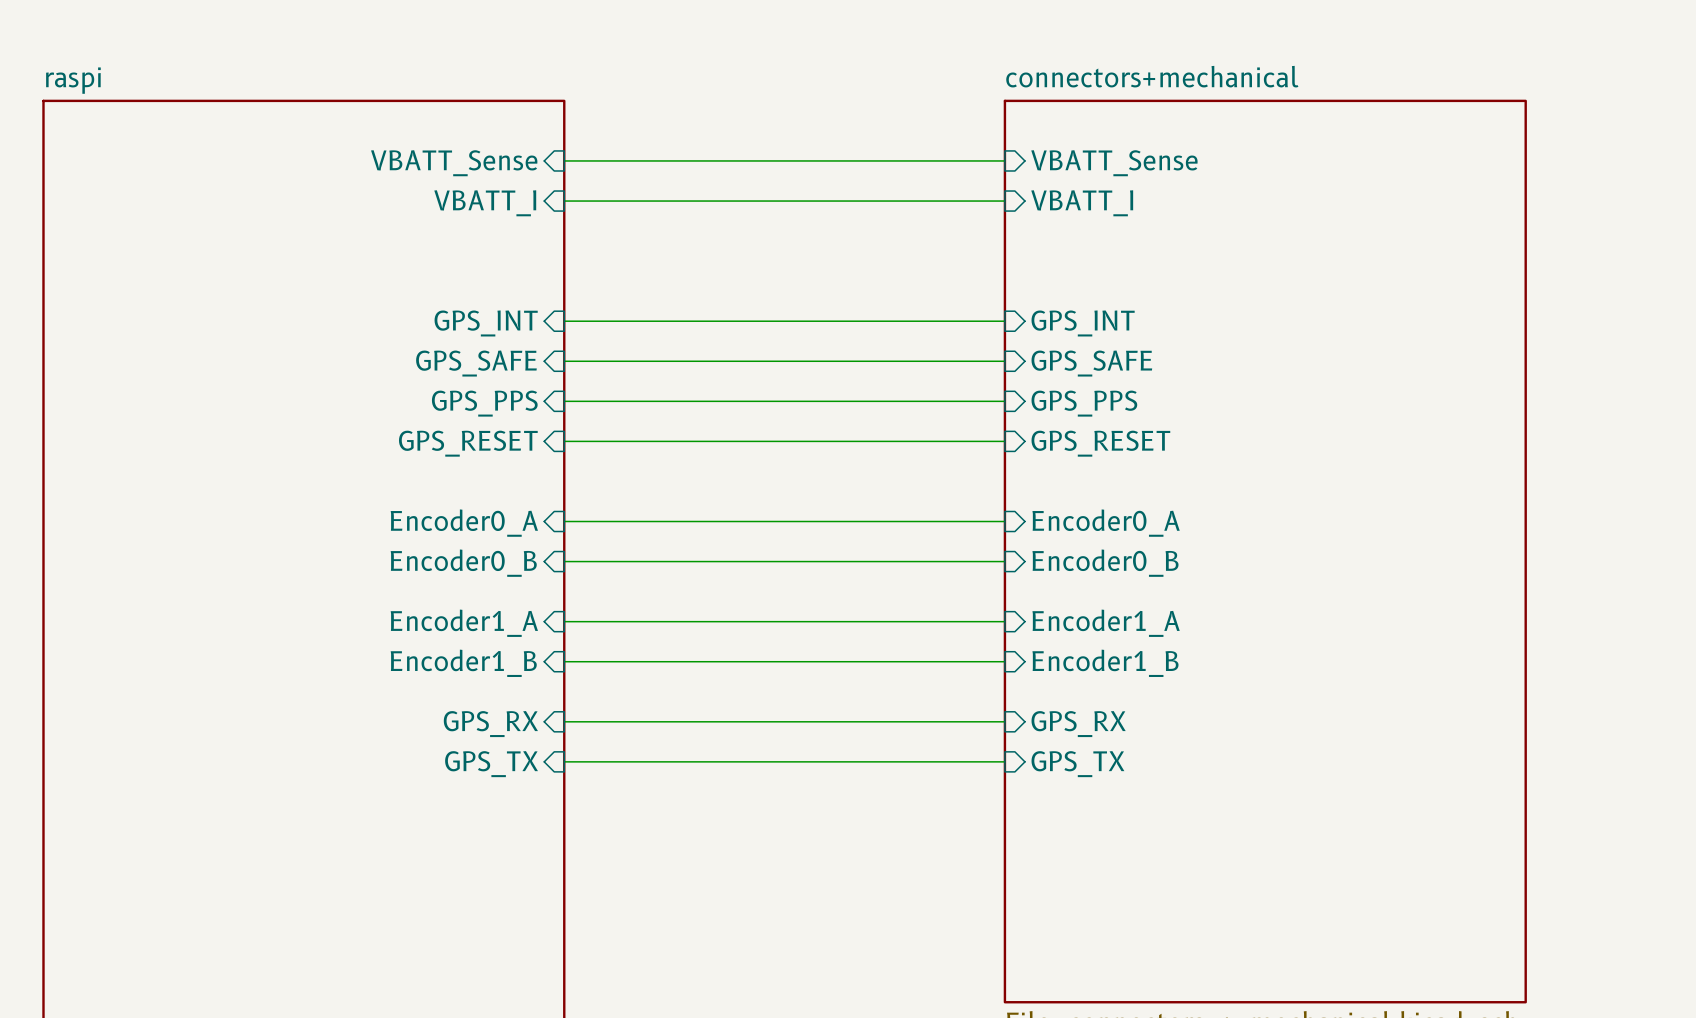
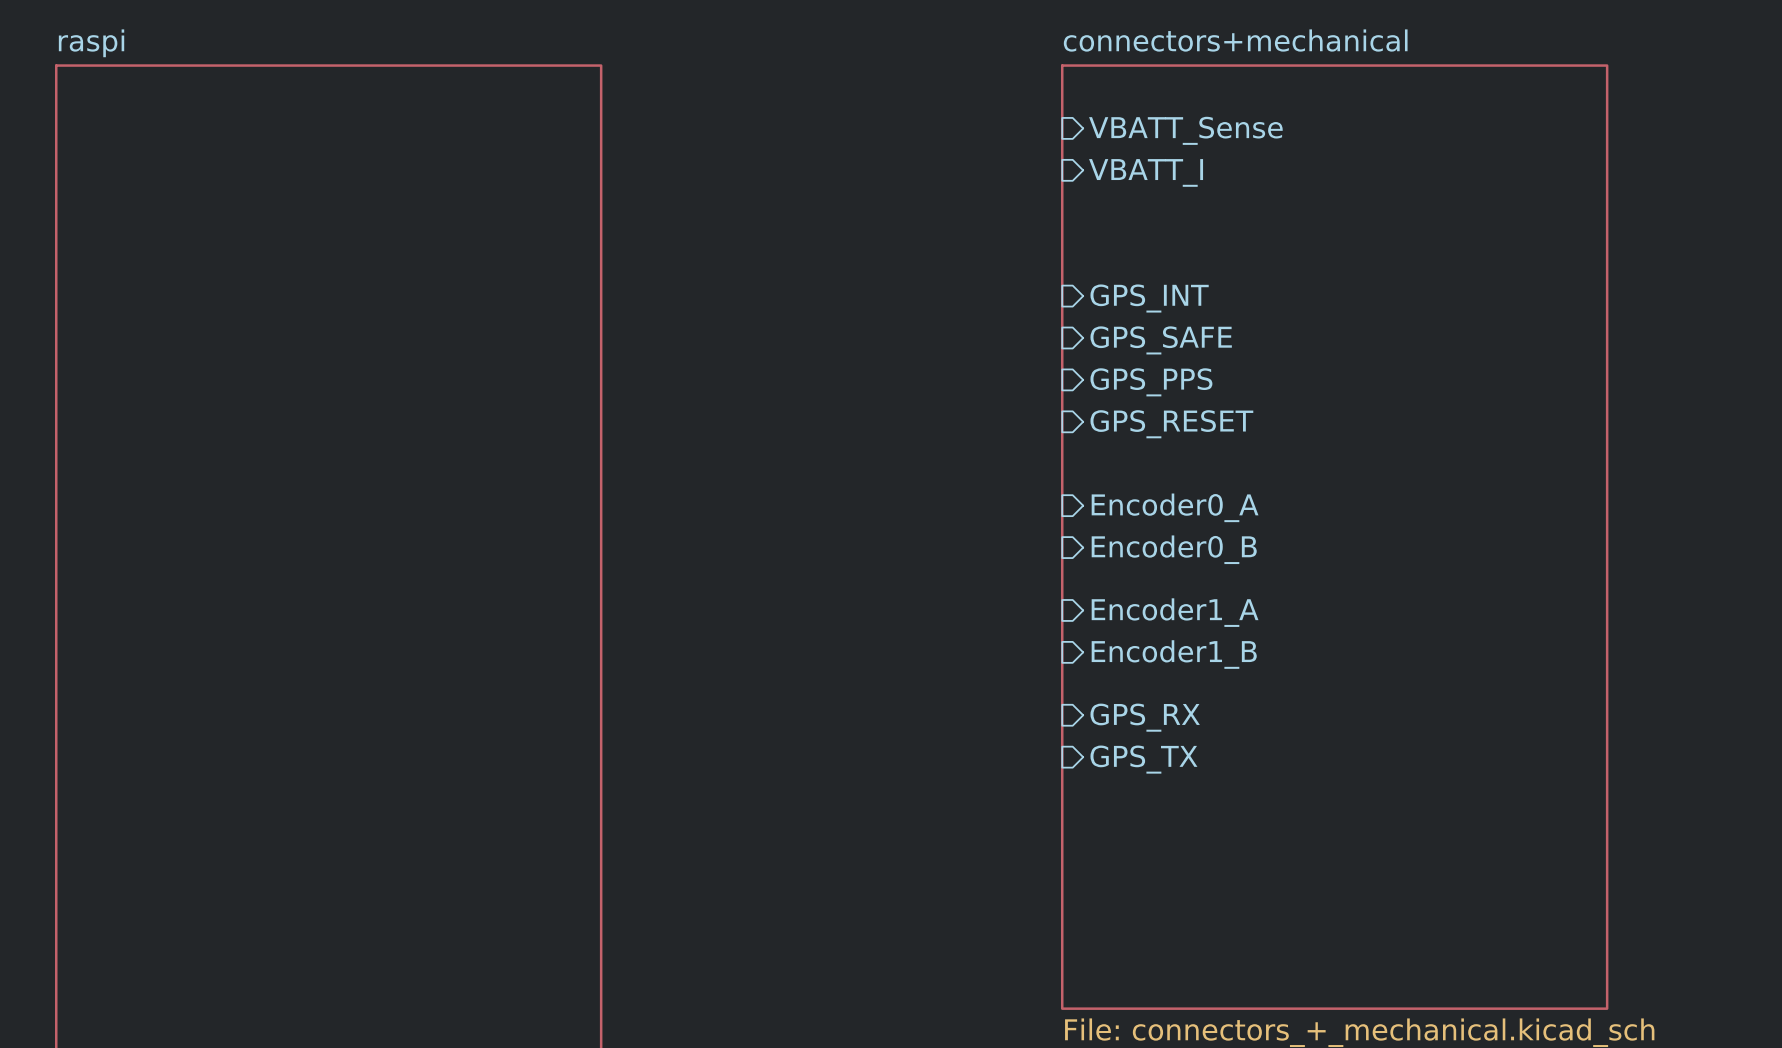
wire: (564, 160) (1004, 160) -> none
sheet pin: VBATT_Sense (454, 163) -> none
wire: (564, 201) (1004, 201) -> none
sheet pin: VBATT_I (485, 203) -> none
wire: (564, 321) (1004, 321) -> none
sheet pin: GPS_INT (486, 323) -> none
wire: (564, 361) (1004, 361) -> none
sheet pin: GPS_SAFE (476, 363) -> none
wire: (564, 401) (1004, 401) -> none
sheet pin: GPS_PPS (484, 403) -> none
wire: (564, 441) (1004, 441) -> none
sheet pin: GPS_RESET (468, 443) -> none
wire: (564, 521) (1004, 521) -> none
sheet pin: Encoder0_A (464, 523) -> none
wire: (564, 561) (1004, 561) -> none
sheet pin: Encoder0_B (463, 563) -> none
wire: (564, 621) (1004, 621) -> none
sheet pin: Encoder1_A (464, 623) -> none
wire: (564, 661) (1004, 661) -> none
sheet pin: Encoder1_B (463, 663) -> none
wire: (564, 721) (1004, 721) -> none
sheet pin: GPS_RX (490, 724) -> none
wire: (564, 761) (1004, 761) -> none
sheet pin: GPS_TX (491, 764) -> none

